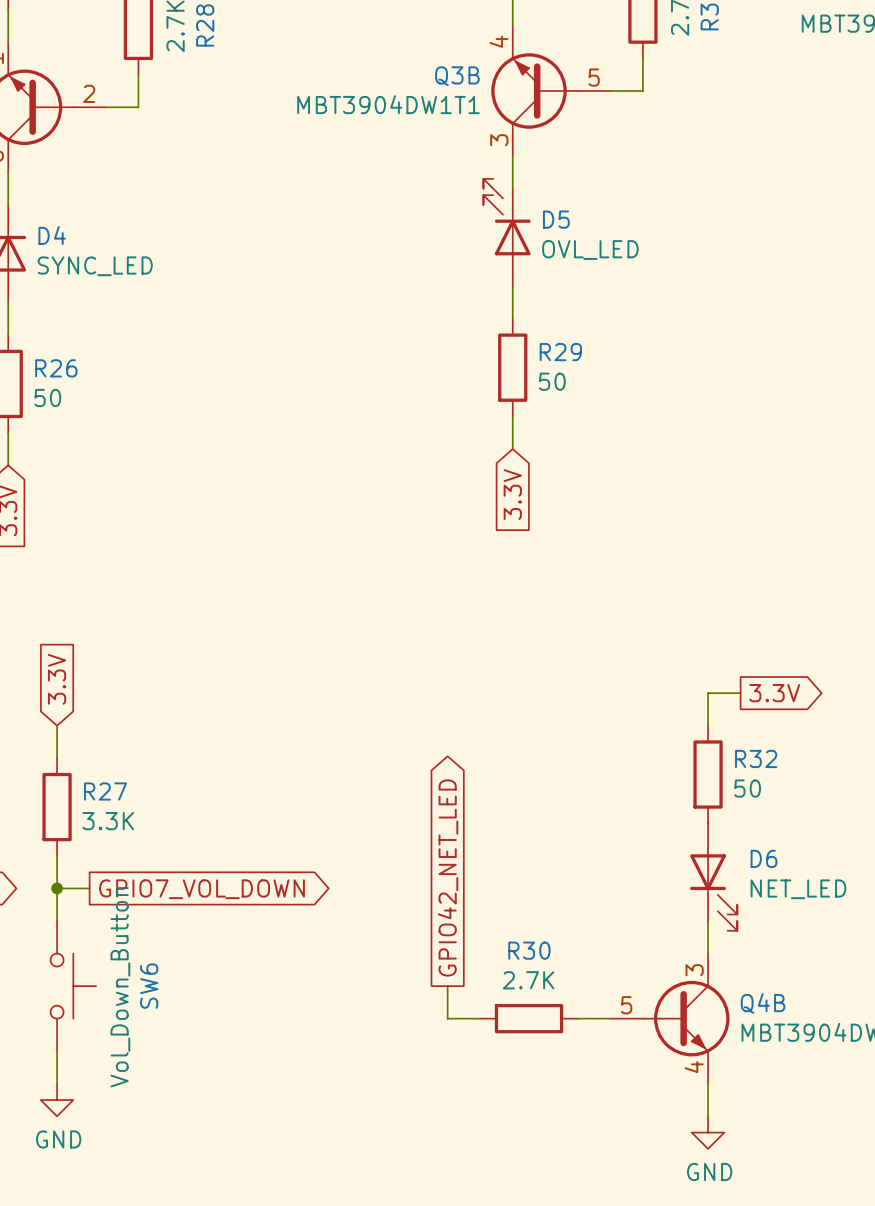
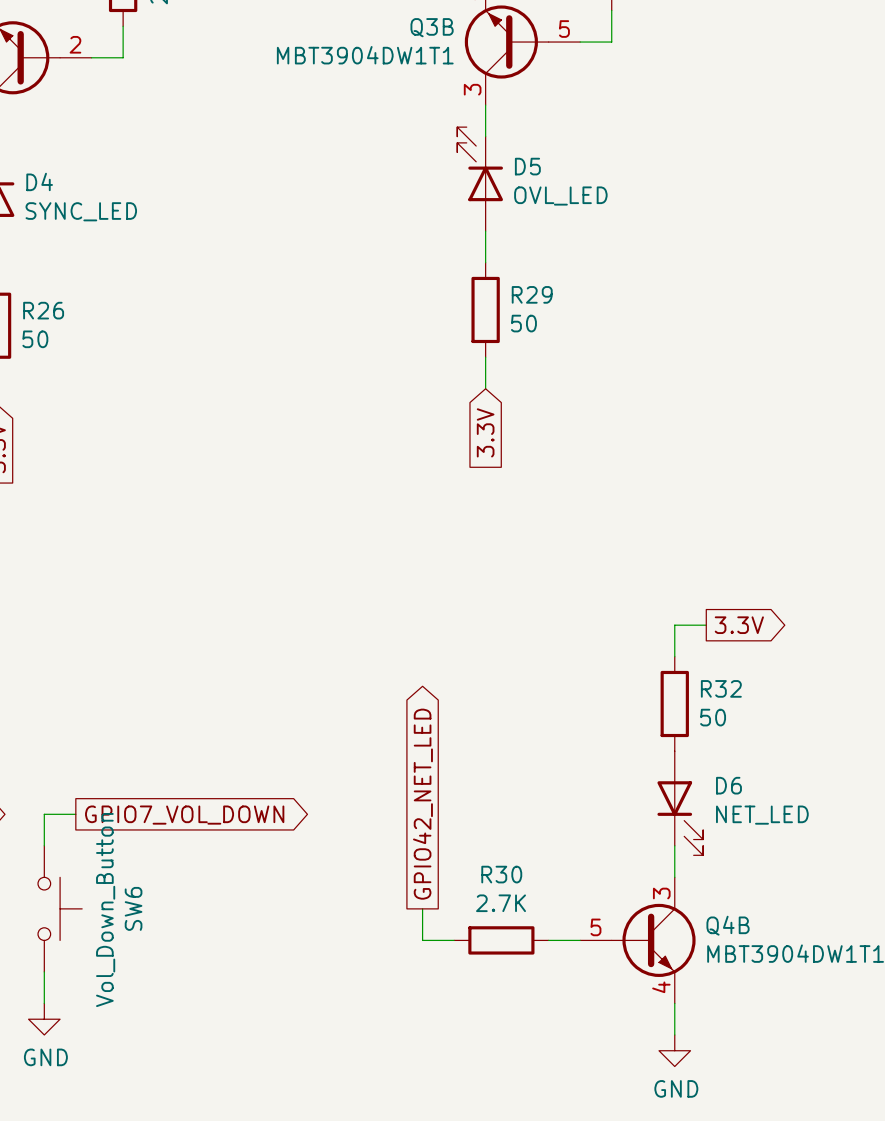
global label: 3.3V (57, 679) -> none
wire: (57, 725) (57, 758) -> none
R27: 3.3K (57, 807) -> none
wire: (57, 855) (57, 888) -> none
junction: (57, 888) -> none

